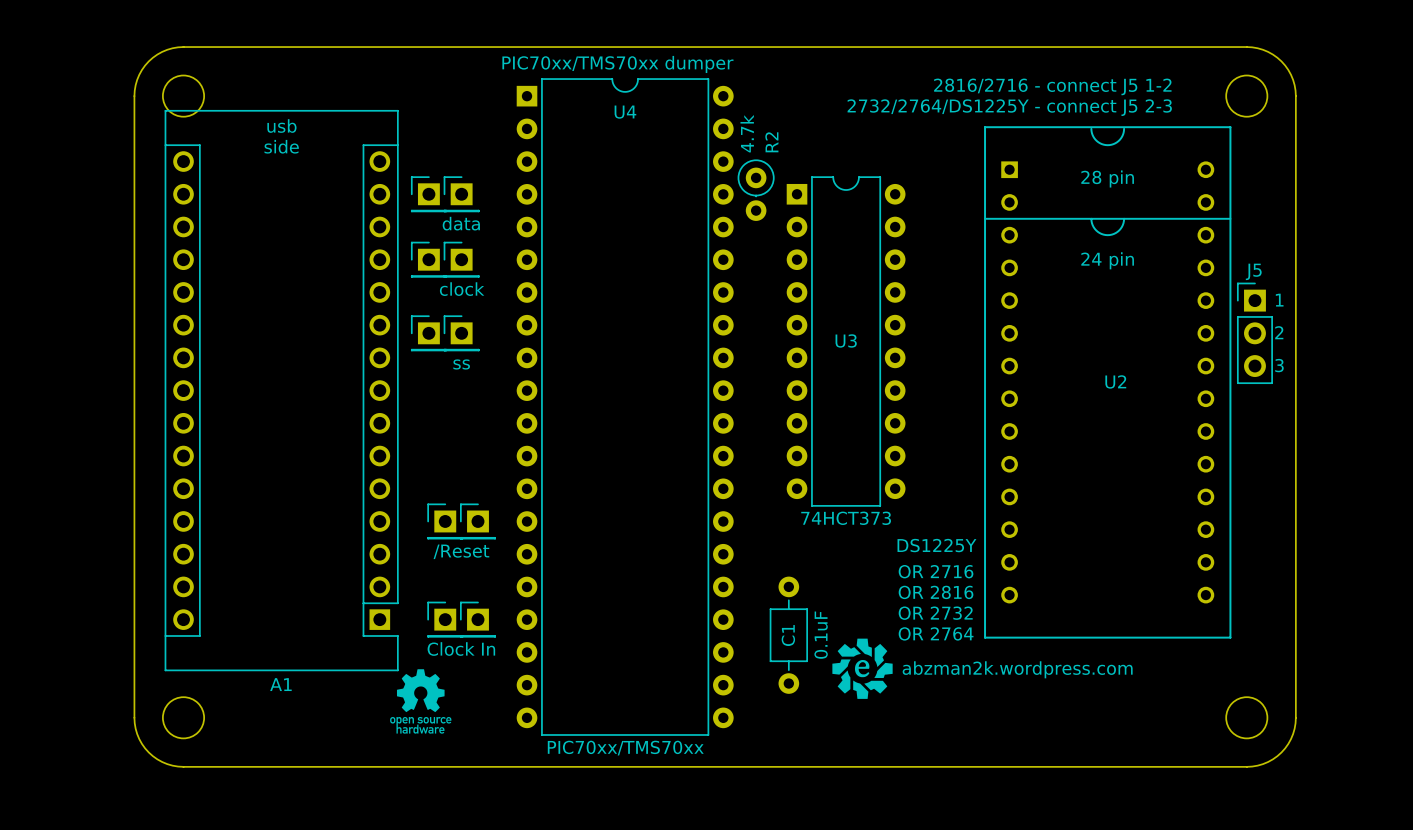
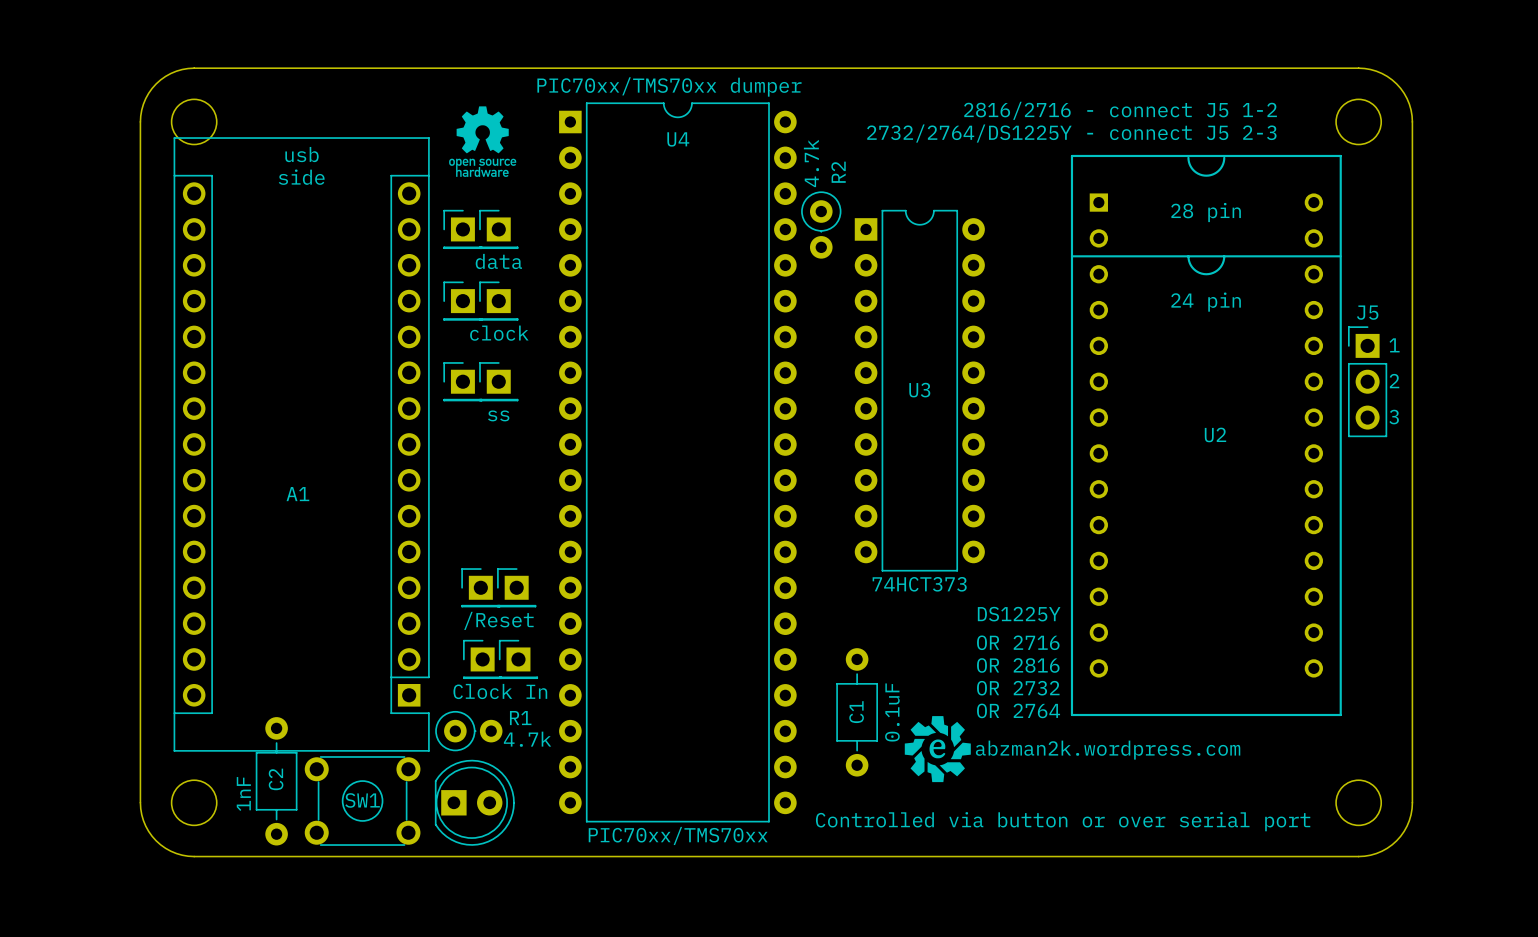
drawing: none -> [449, 106, 517, 177]
part position: (445, 619) -> (482, 659)
part position: (477, 619) -> (518, 659)
R1: none -> 4.7k (468, 731)
drawing: [390, 669, 452, 734] -> none
A1 name position: A1 (280, 684) -> A1 (297, 494)
C2: none -> 1nF (276, 781)
SW1: none -> (362, 801)
part: none -> (474, 802)
text: none -> Controlled via button or over serial port (1063, 821)

